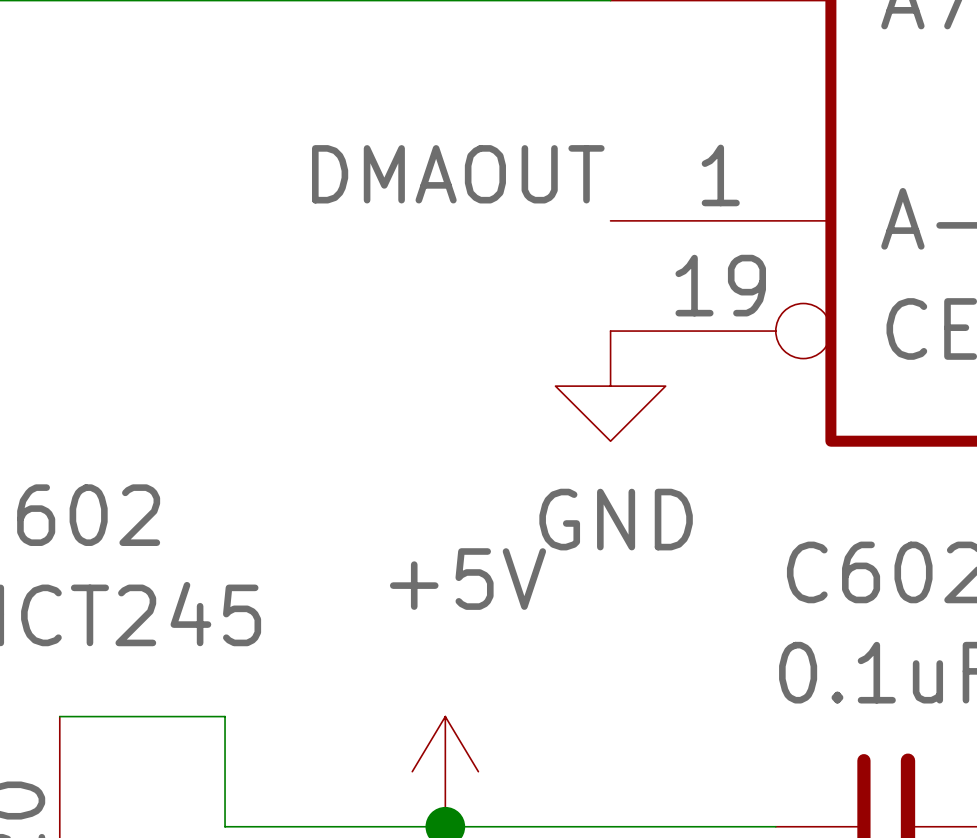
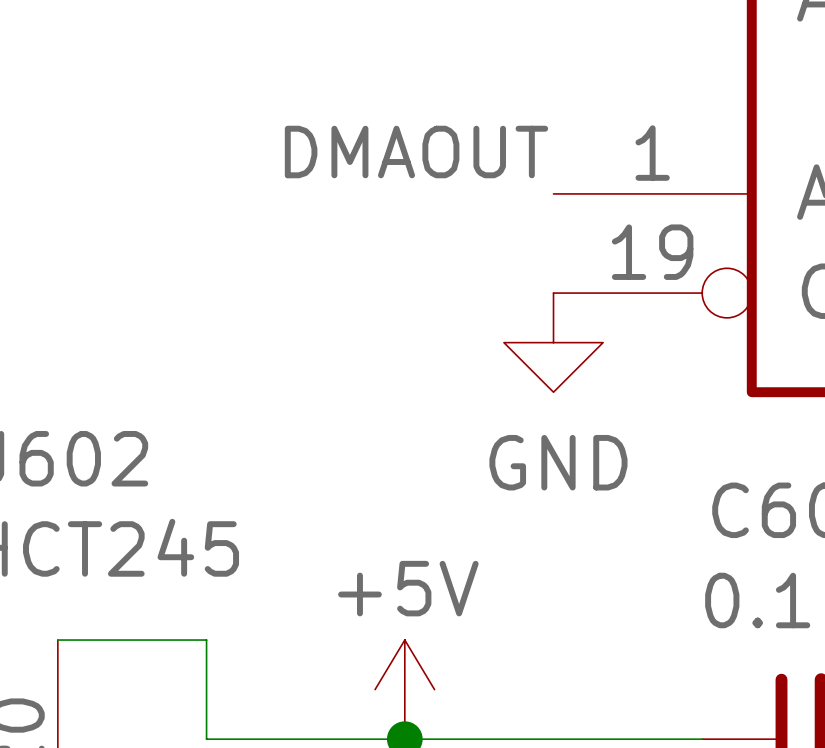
power symbol text position: +5V (468, 579) -> +5V (408, 588)

